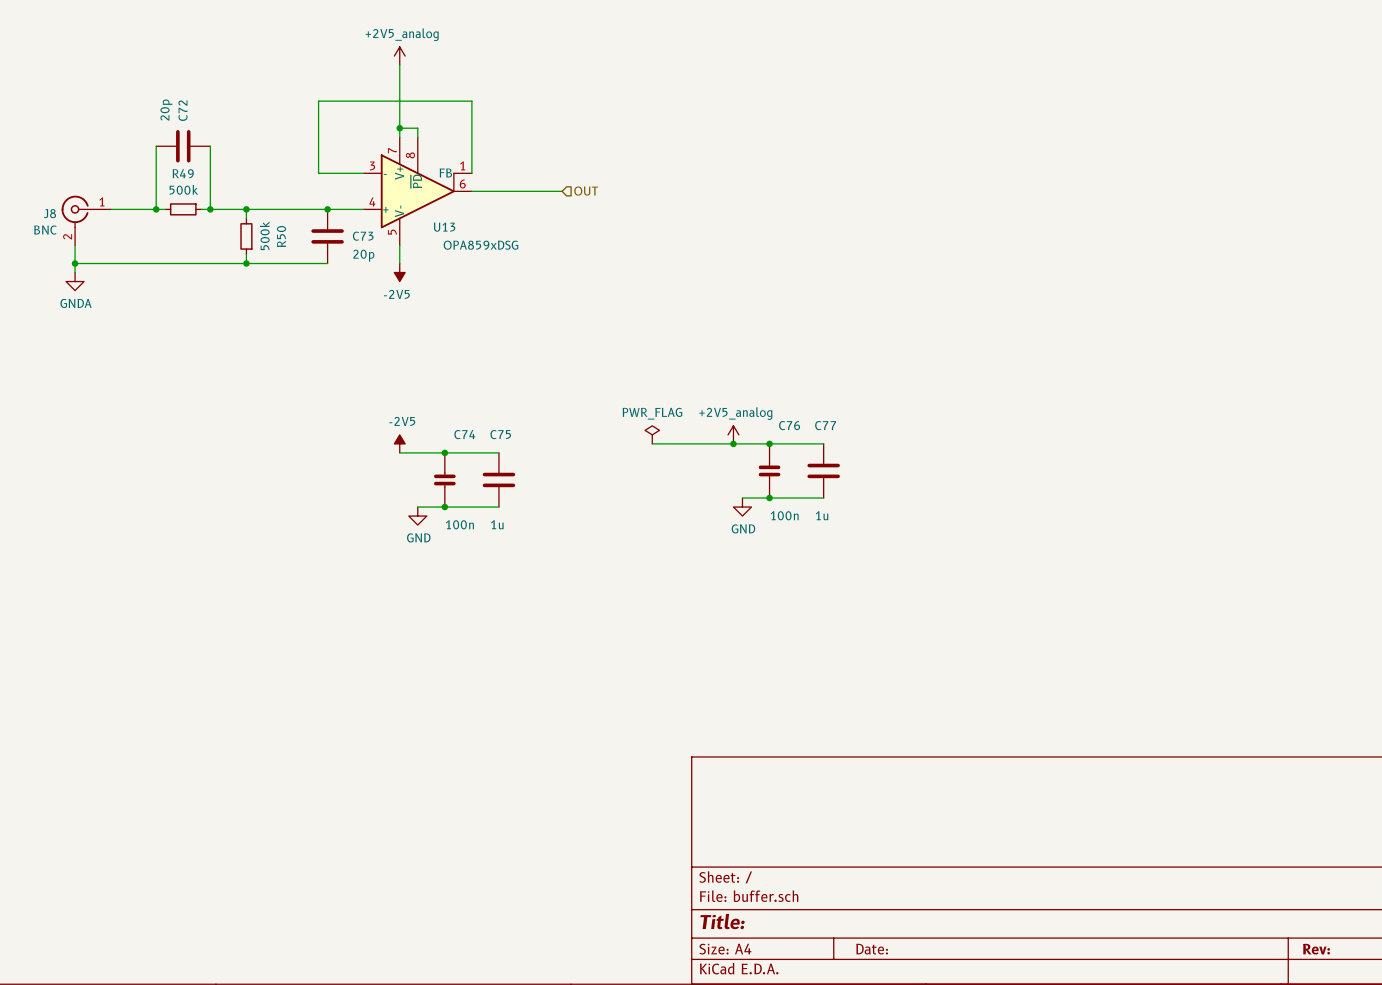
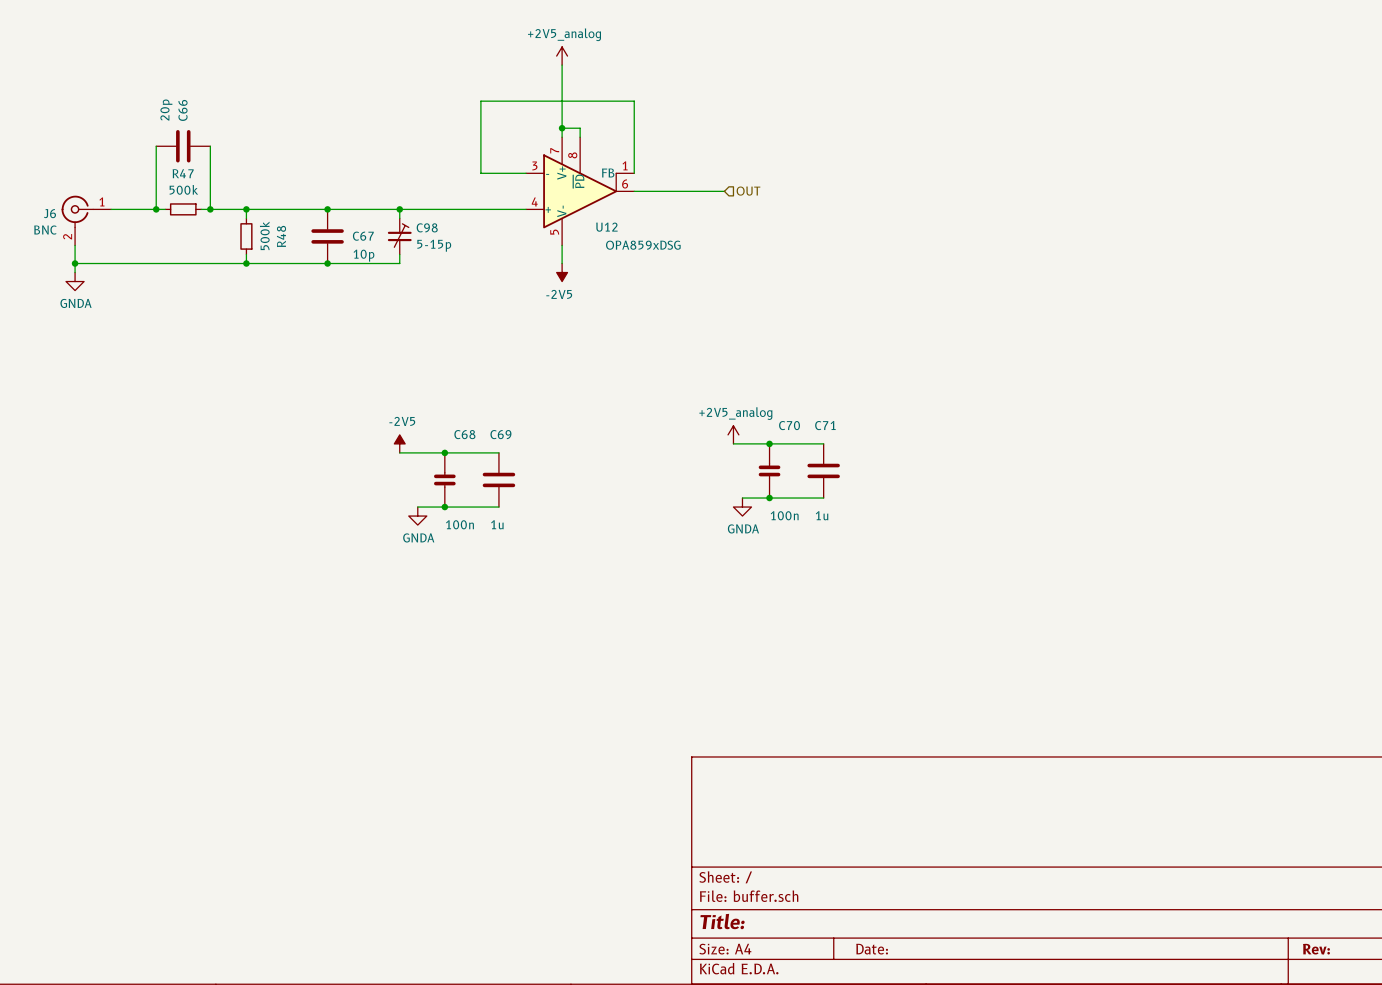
power symbol position: +2V5_analog (399, 56) -> +2V5_analog (562, 56)
wire: (399, 65) (399, 137) -> (562, 65) (562, 137)
C72 name: C72 (183, 110) -> C66 (183, 110)
wire: (399, 128) (417, 128) (417, 137) -> (562, 128) (580, 128) (580, 137)
junction: (399, 128) -> none
junction: none -> (562, 128)
R49 name: R49 (183, 173) -> R47 (183, 173)
wire: (363, 173) (318, 173) (318, 101) (471, 101) (471, 173) -> (526, 173) (480, 173) (480, 101) (634, 101) (634, 173)
U13: OPA859xDSG (417, 191) -> none
wire: (471, 191) (562, 191) -> (634, 191) (724, 191)
U12: none -> OPA859xDSG (580, 191)
hierarchical label position: OUT (586, 191) -> OUT (748, 191)
wire: none -> (363, 209) (526, 209)
junction: none -> (399, 209)
J8 name: J8 (49, 213) -> J6 (49, 213)
R50 name: R50 (281, 236) -> R48 (281, 236)
C73 name: C73 (363, 236) -> C67 (363, 236)
C98: none -> 5-15p (399, 236)
wire: none -> (562, 245) (562, 263)
C73 value: 20p (363, 255) -> 10p (363, 255)
wire: none -> (327, 263) (399, 263)
junction: none -> (327, 263)
power symbol position: -2V5 (399, 272) -> -2V5 (562, 272)
C76 name: C76 (789, 425) -> C70 (789, 425)
C77 name: C77 (825, 425) -> C71 (825, 425)
C74 name: C74 (464, 434) -> C68 (464, 434)
C75 name: C75 (500, 434) -> C69 (500, 434)
power symbol: PWR_FLAG (652, 434) -> none
wire: (652, 443) (733, 443) -> none
junction: (733, 443) -> none
power symbol: GND (742, 507) -> GNDA (742, 507)
power symbol: GND (417, 516) -> GNDA (417, 516)

